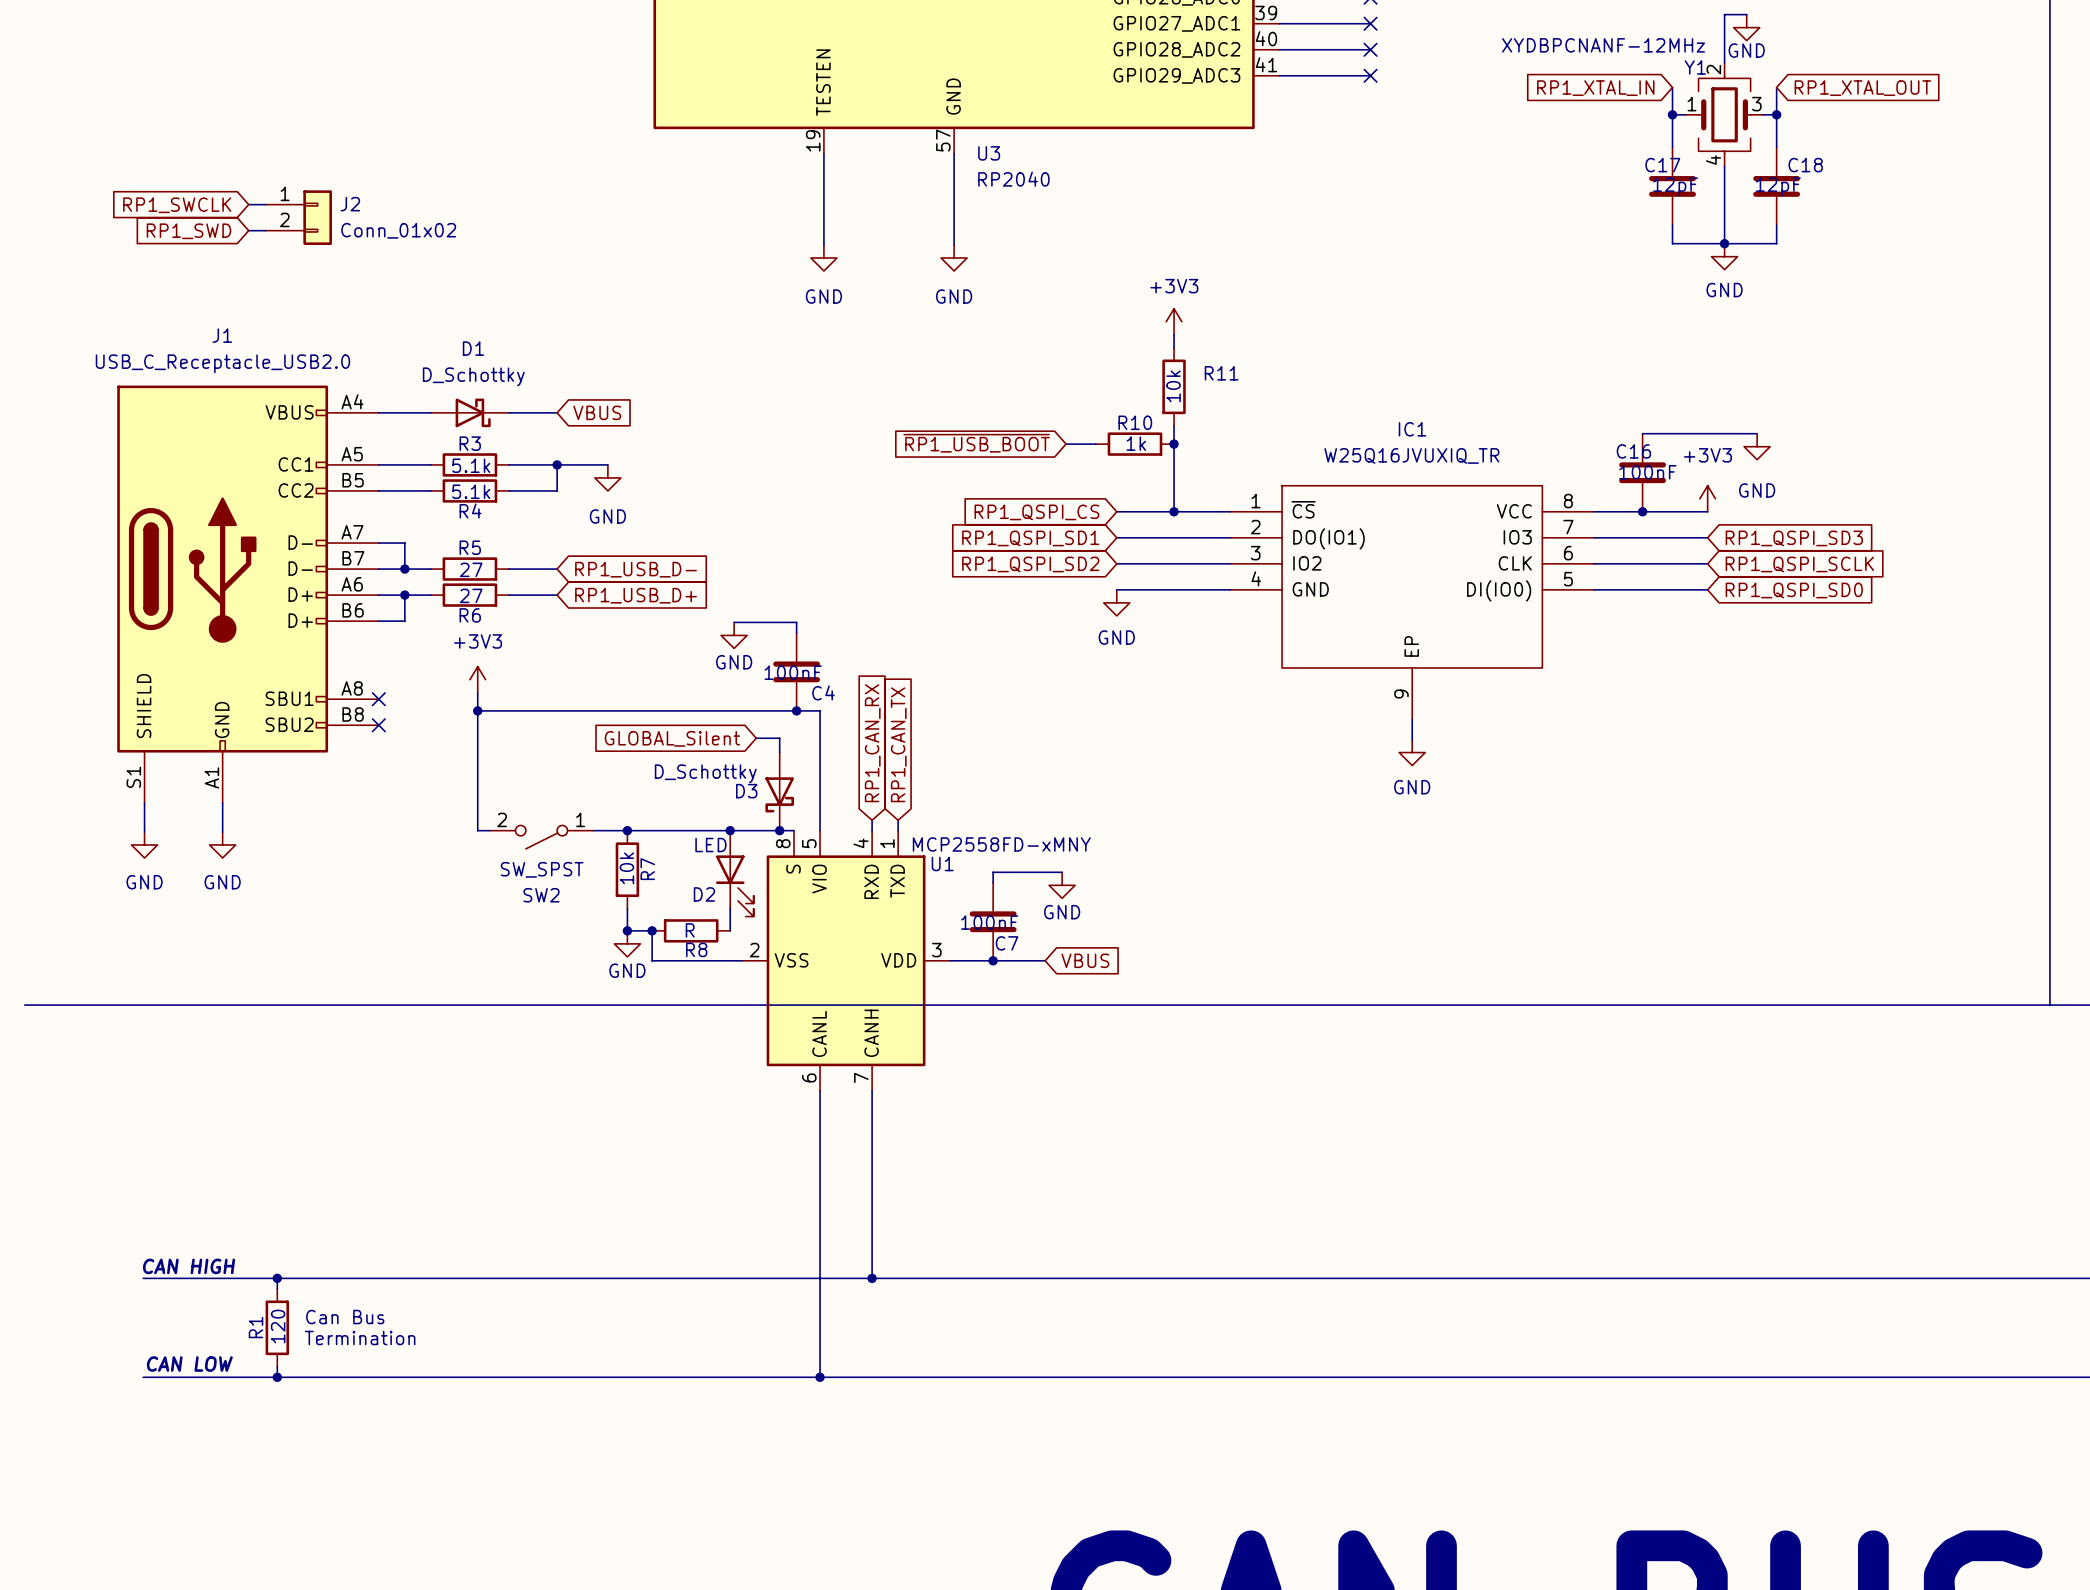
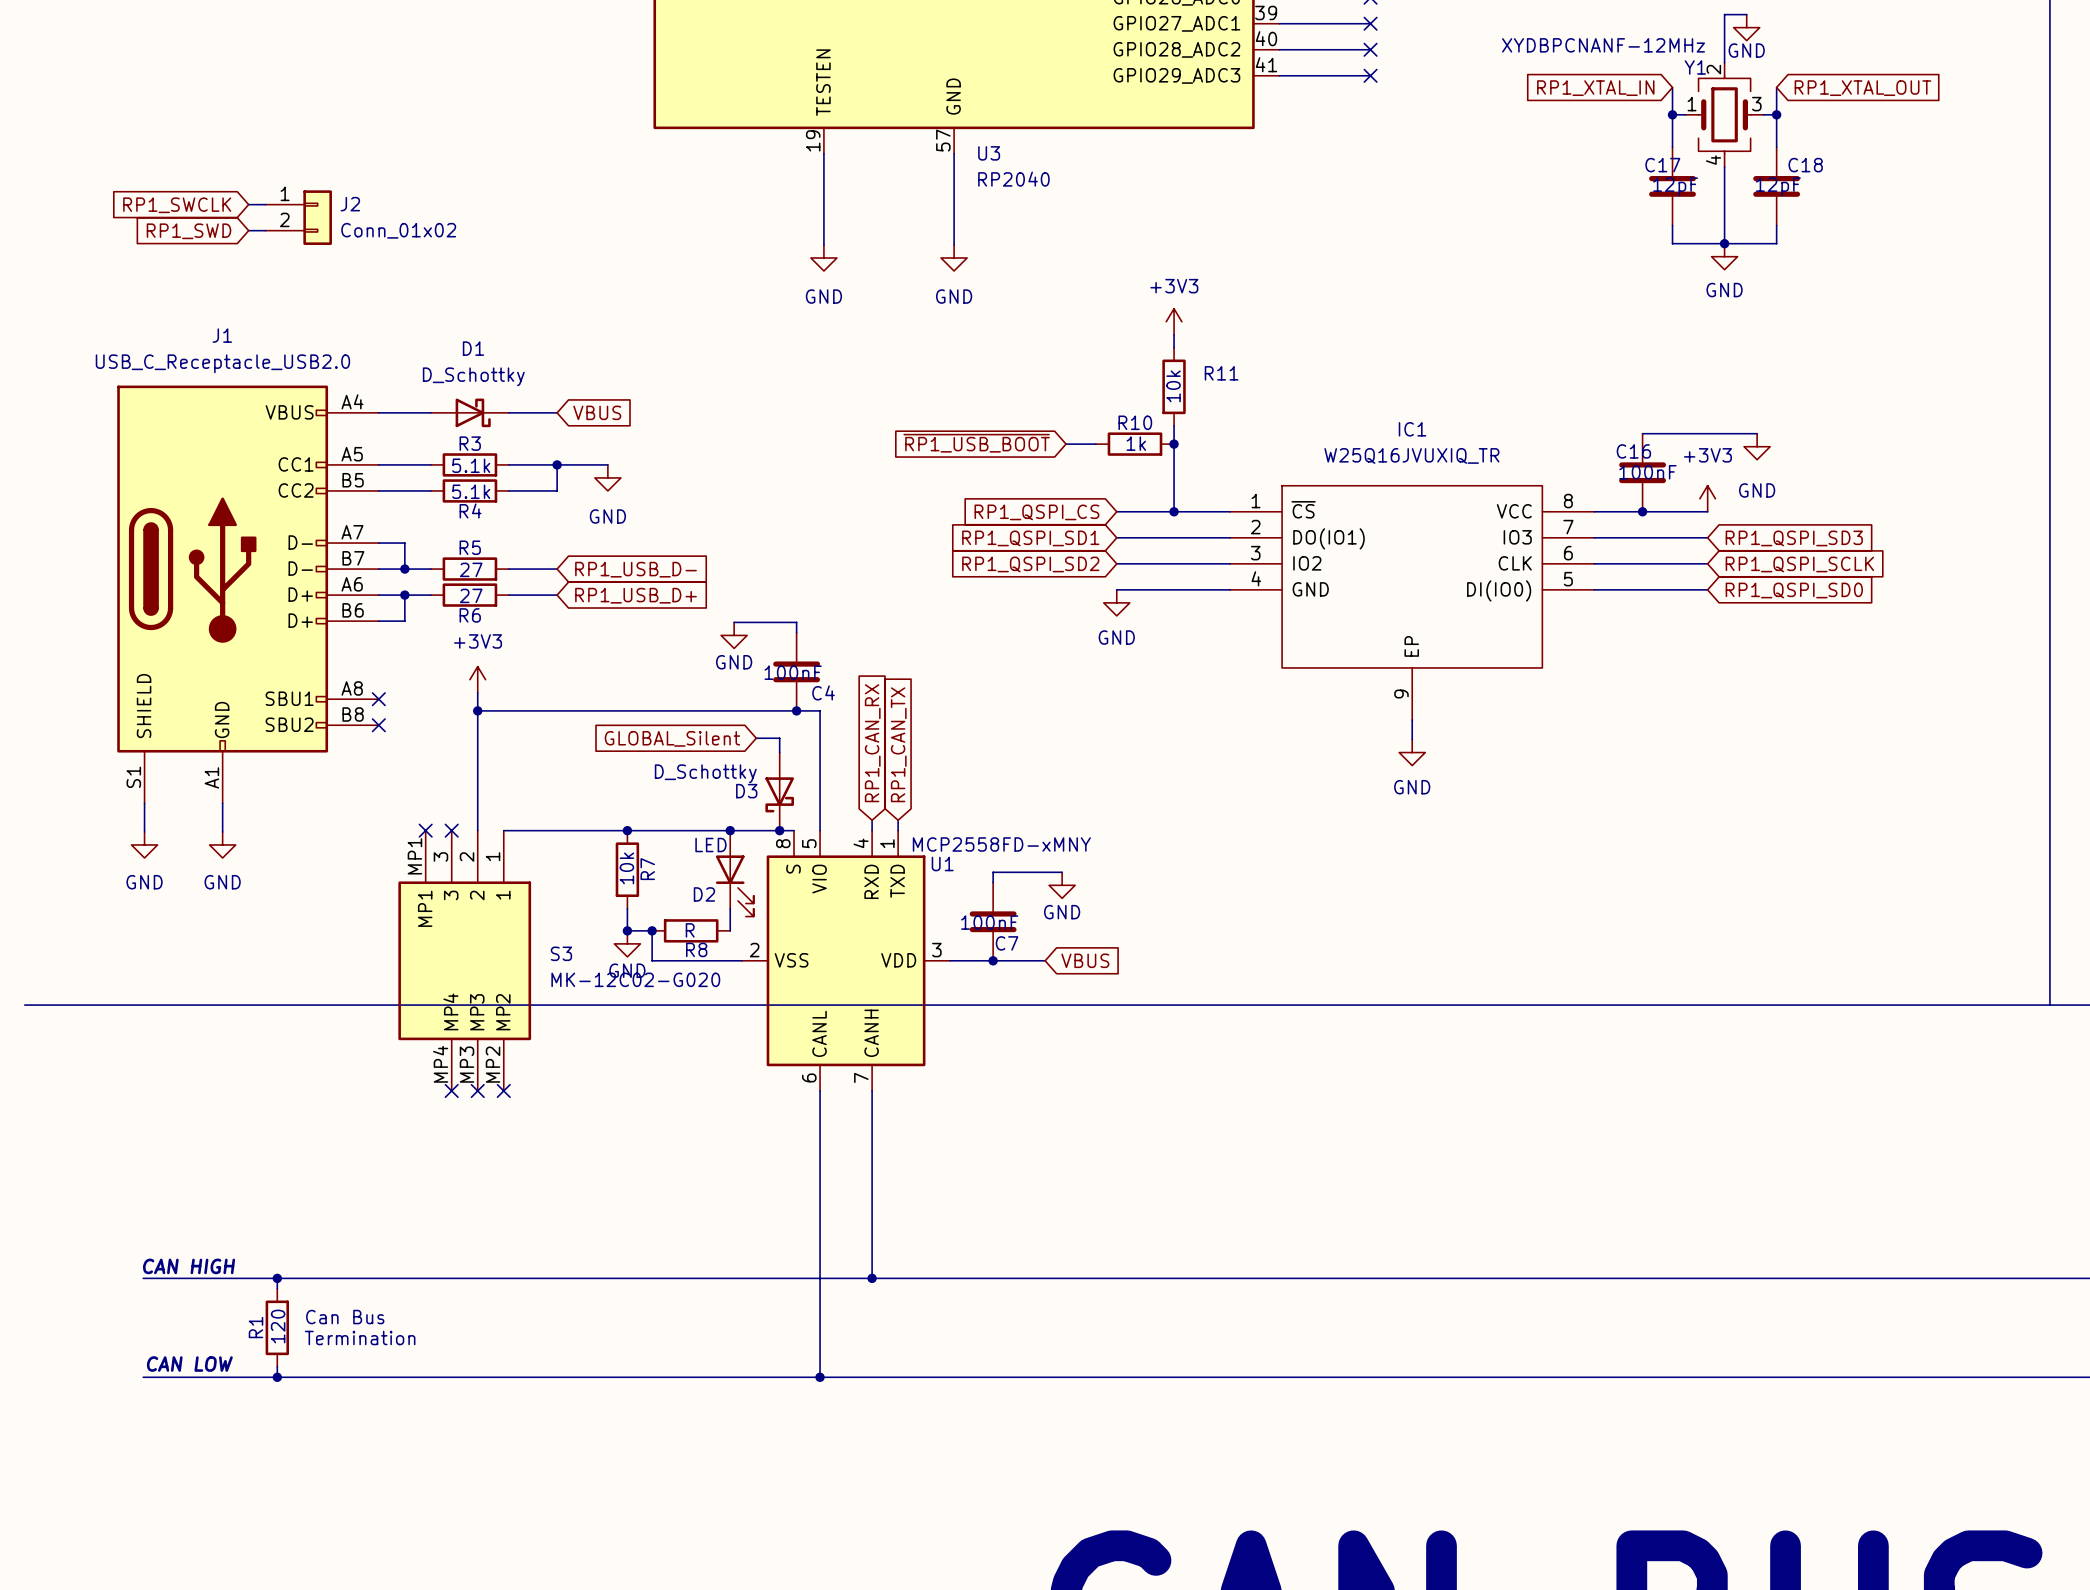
no-connect mark: none -> (425, 830)
no-connect mark: none -> (451, 830)
wire: (477, 830) (489, 830) -> none
wire: none -> (503, 830) (593, 830)
SW2: SW_SPST (541, 837) -> none
S3: none -> MK-12C02-G020 (464, 960)
no-connect mark: none -> (451, 1090)
no-connect mark: none -> (477, 1090)
no-connect mark: none -> (503, 1090)

